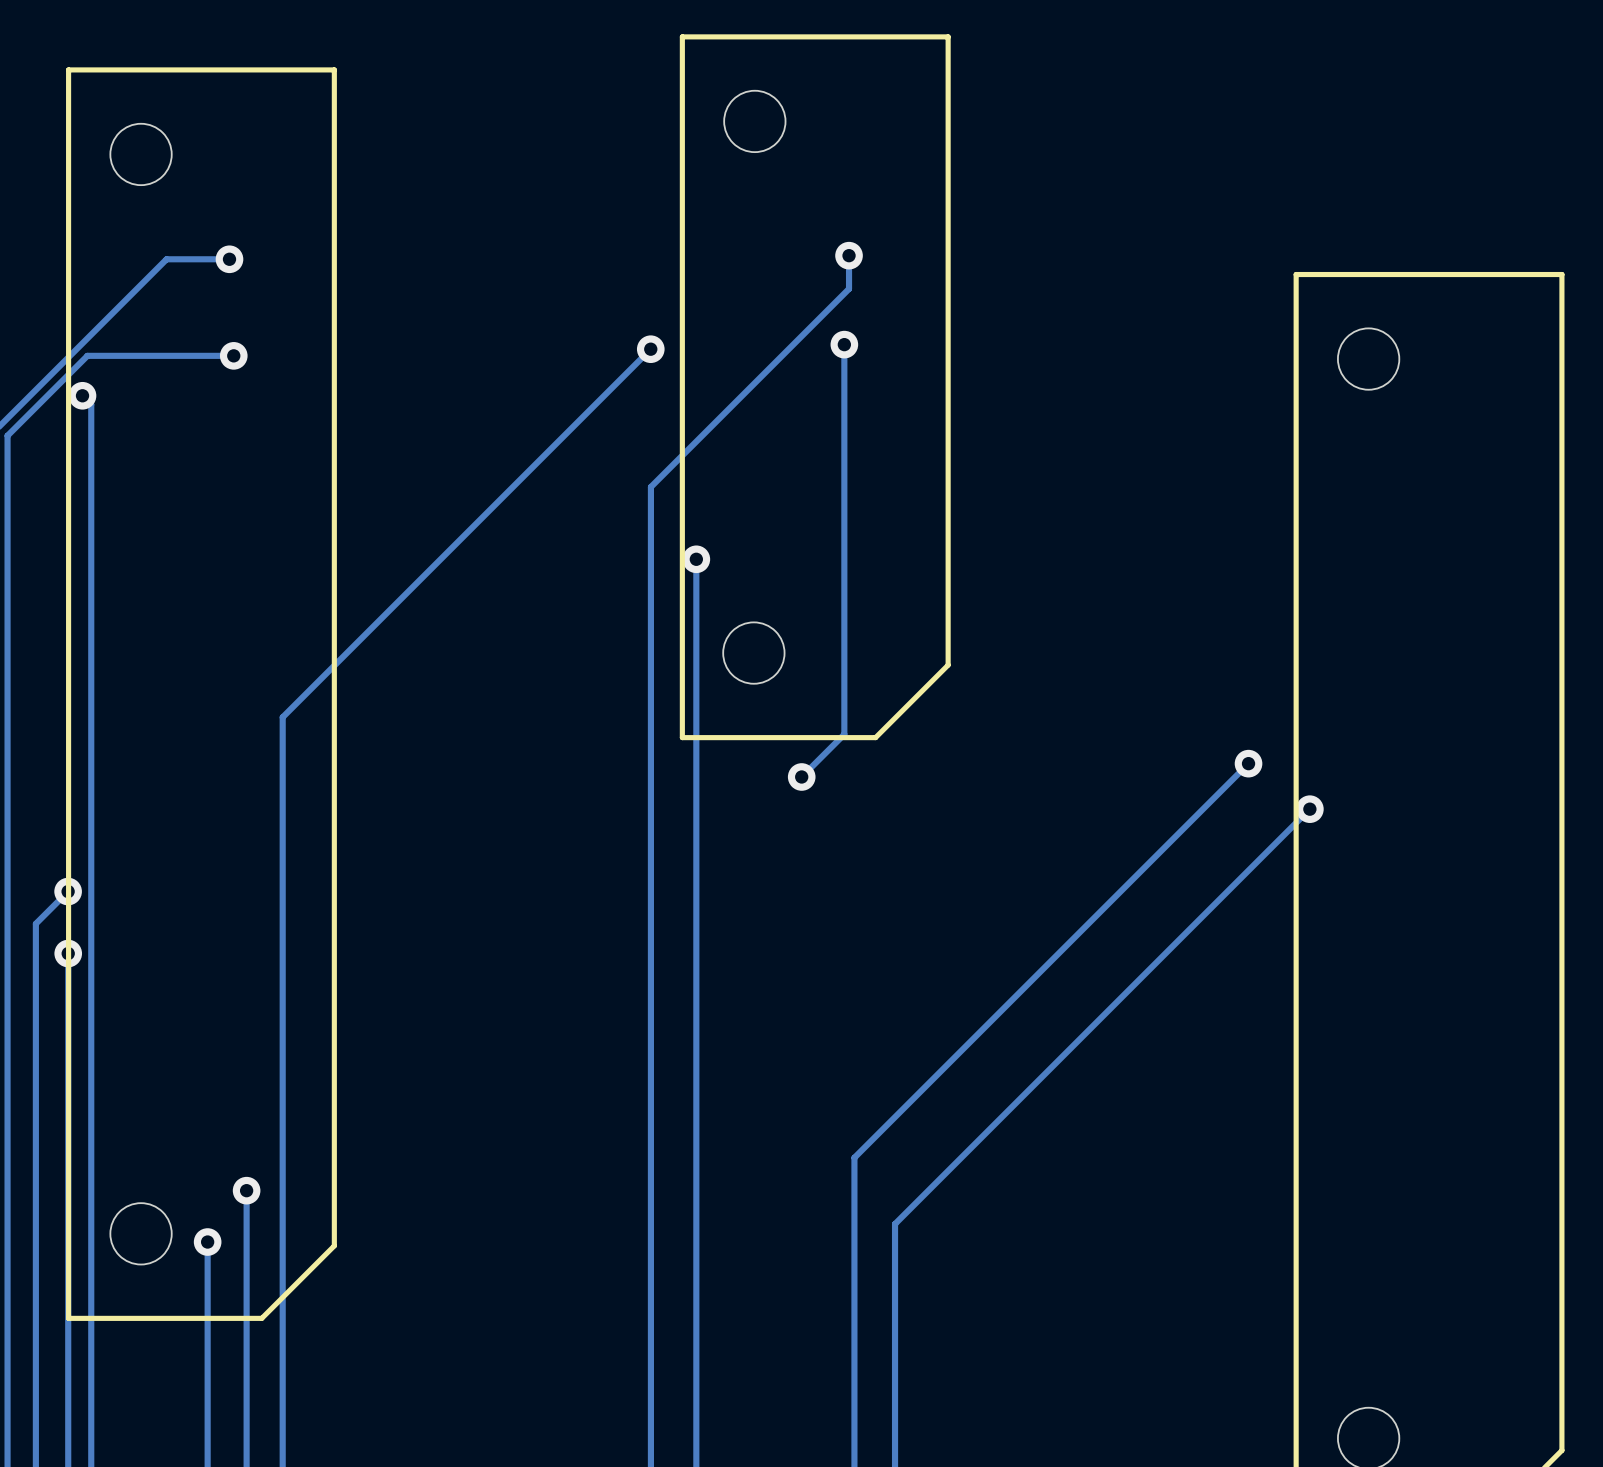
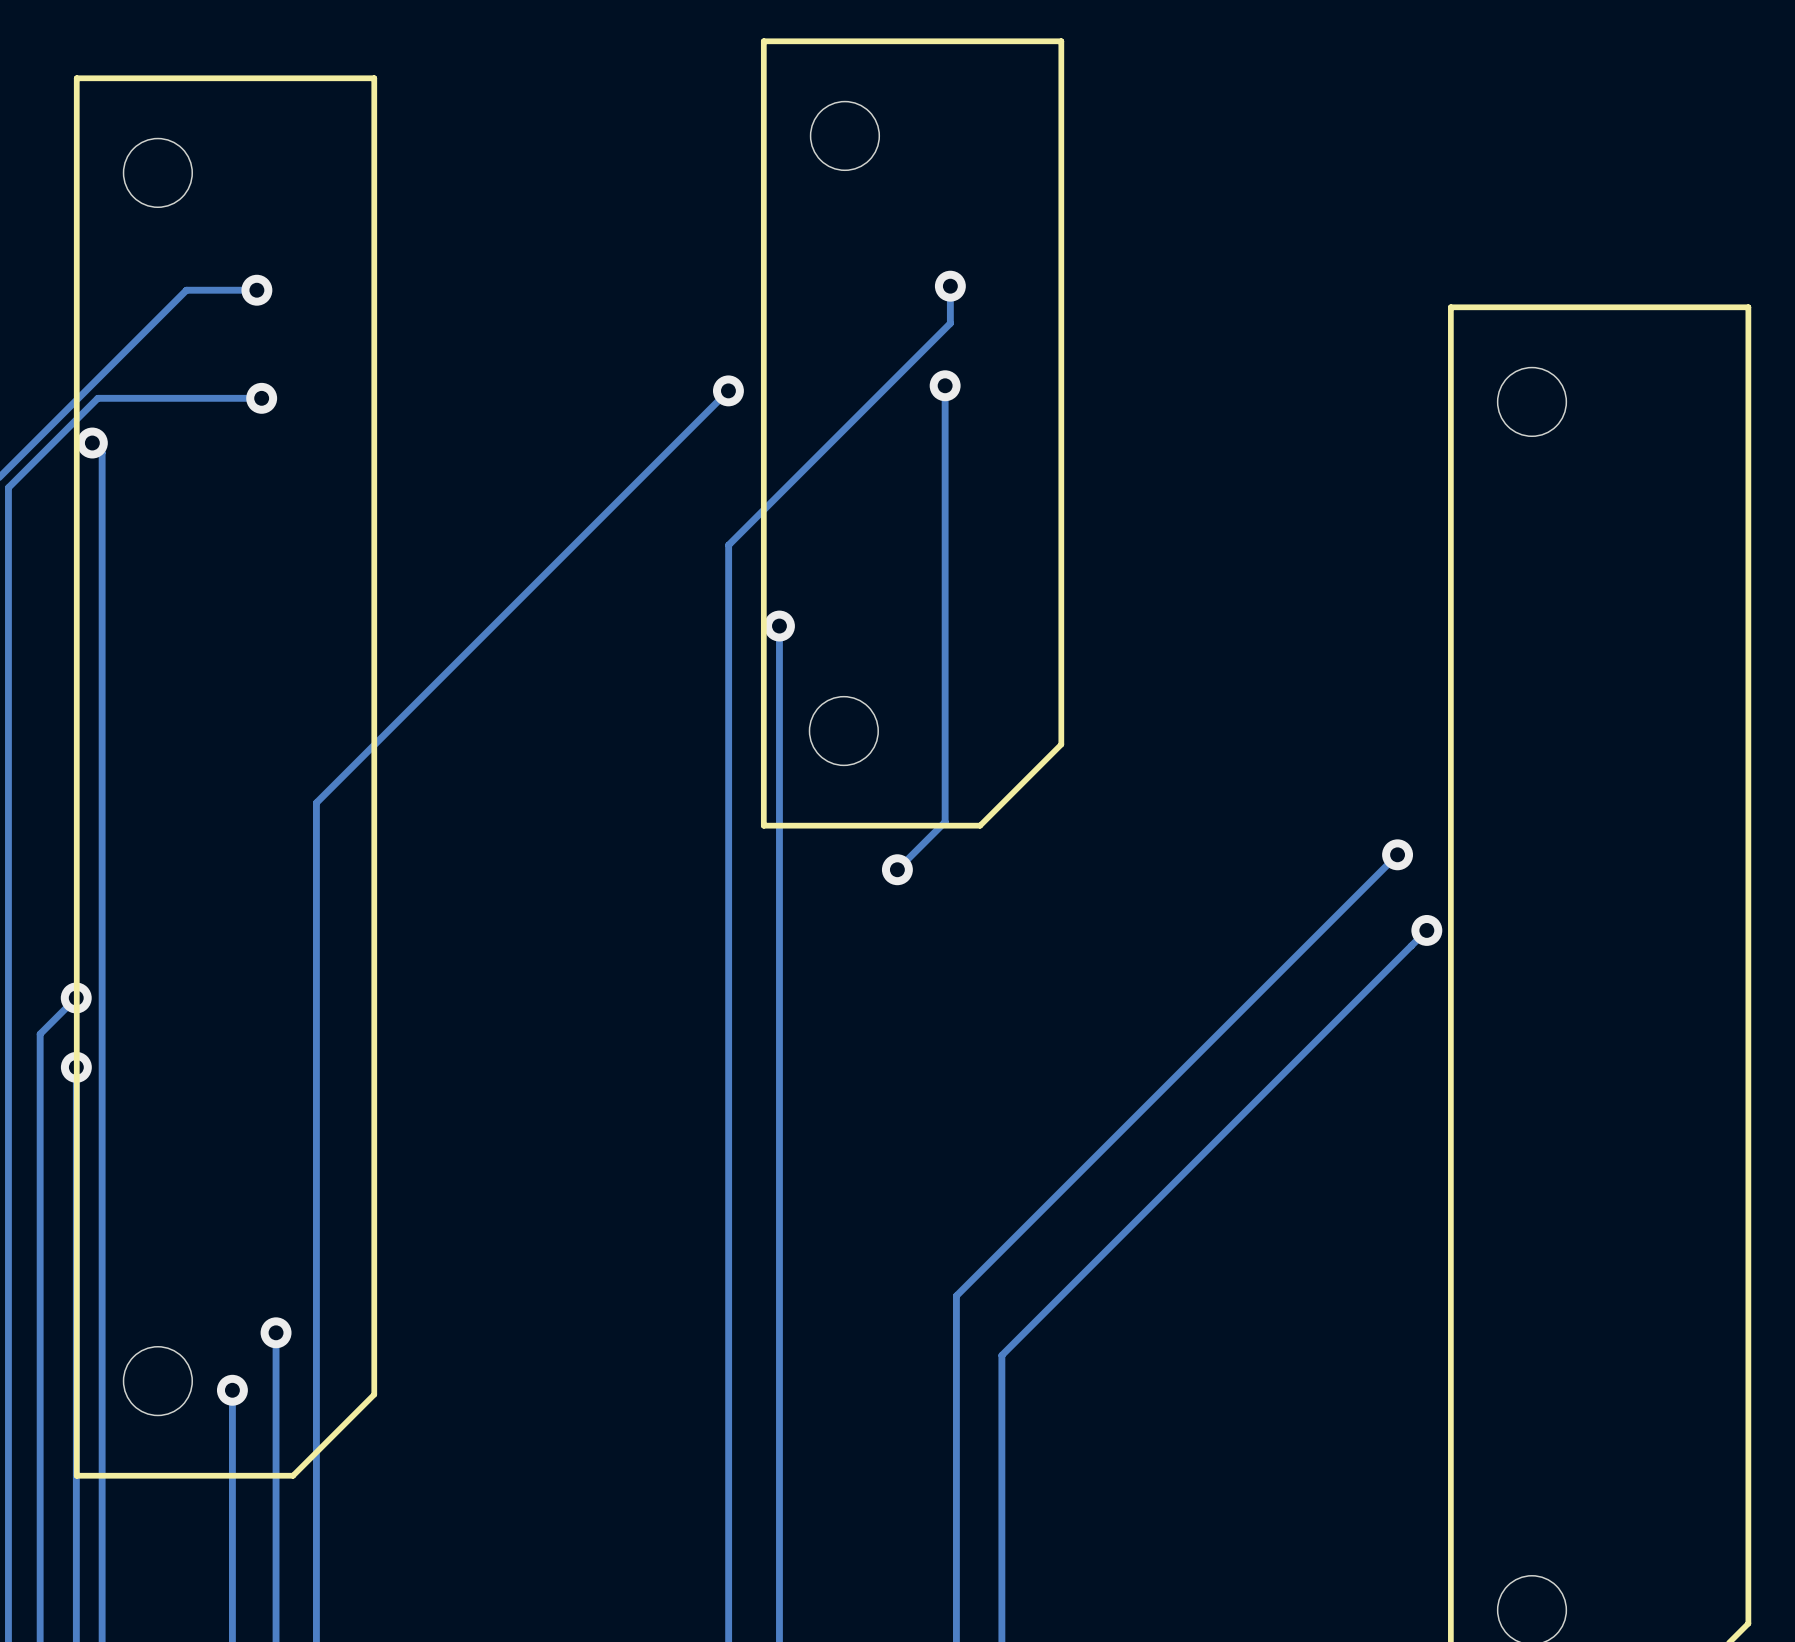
track: (1309, 809) (895, 1224) -> (1426, 930) (1001, 1355) (1001, 1370)
via position: (1309, 809) -> (1426, 930)

